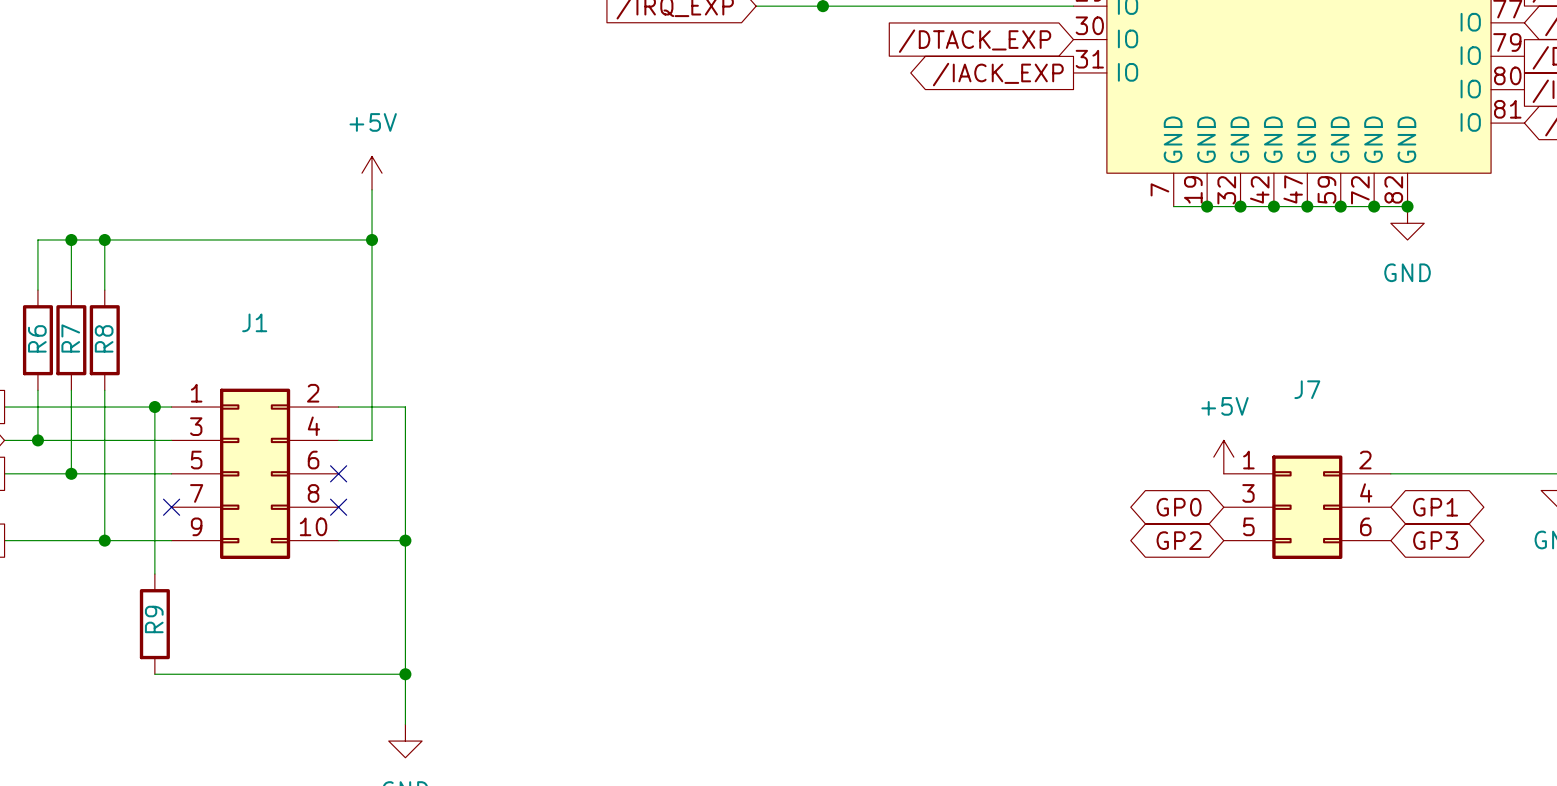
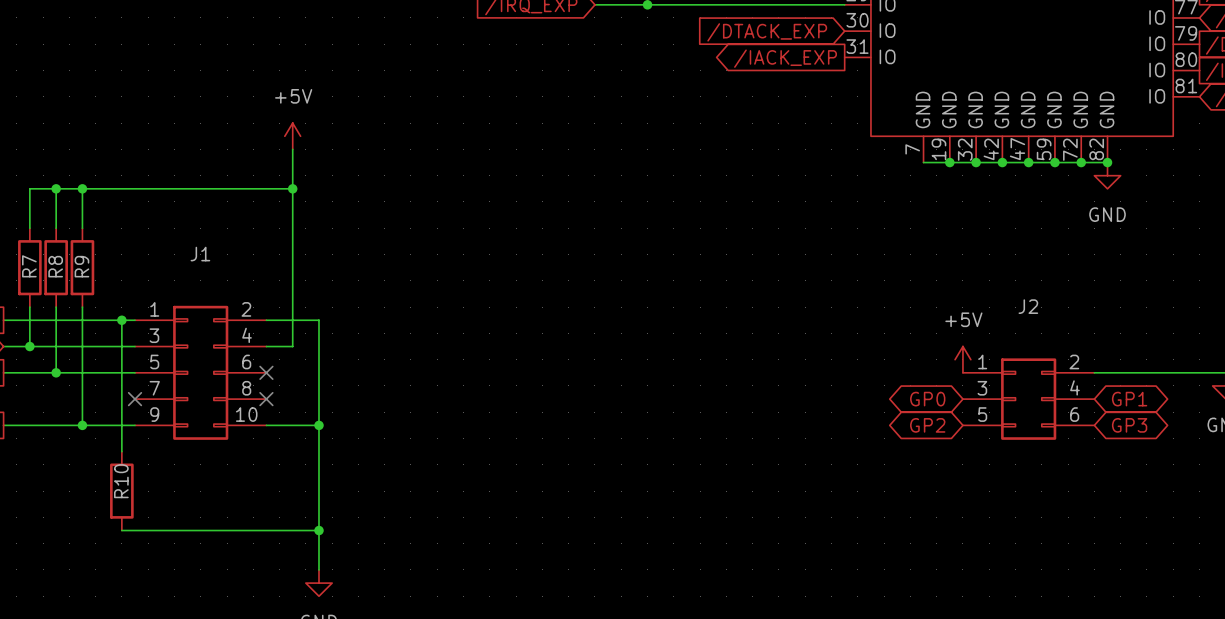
R6 name: R6 (37, 338) -> R7 (29, 266)
R7 name: R7 (70, 338) -> R8 (55, 266)
R8 name: R8 (104, 338) -> R9 (81, 266)
J7 name: J7 (1307, 389) -> J2 (1028, 306)
R9 name: R9 (154, 619) -> R10 (121, 481)

